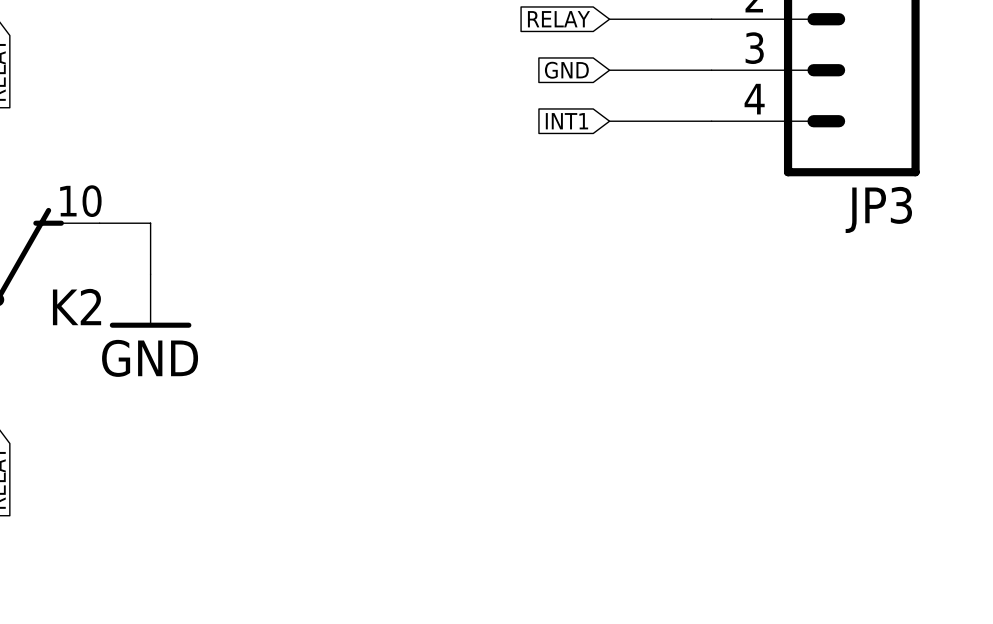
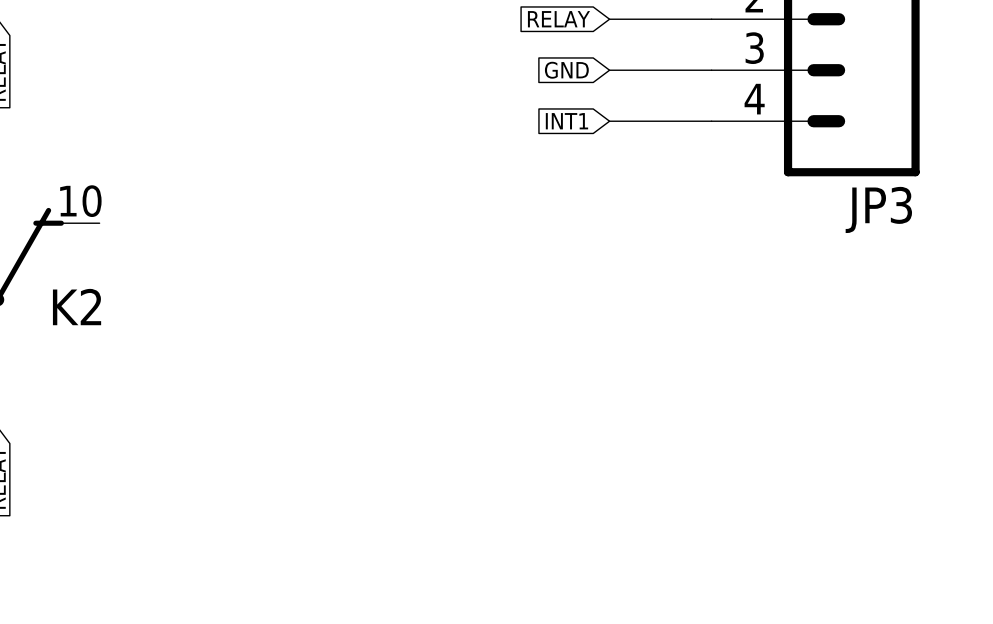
wire: (99, 223) (150, 223) (150, 274) -> none
power symbol: GND (150, 300) -> none

